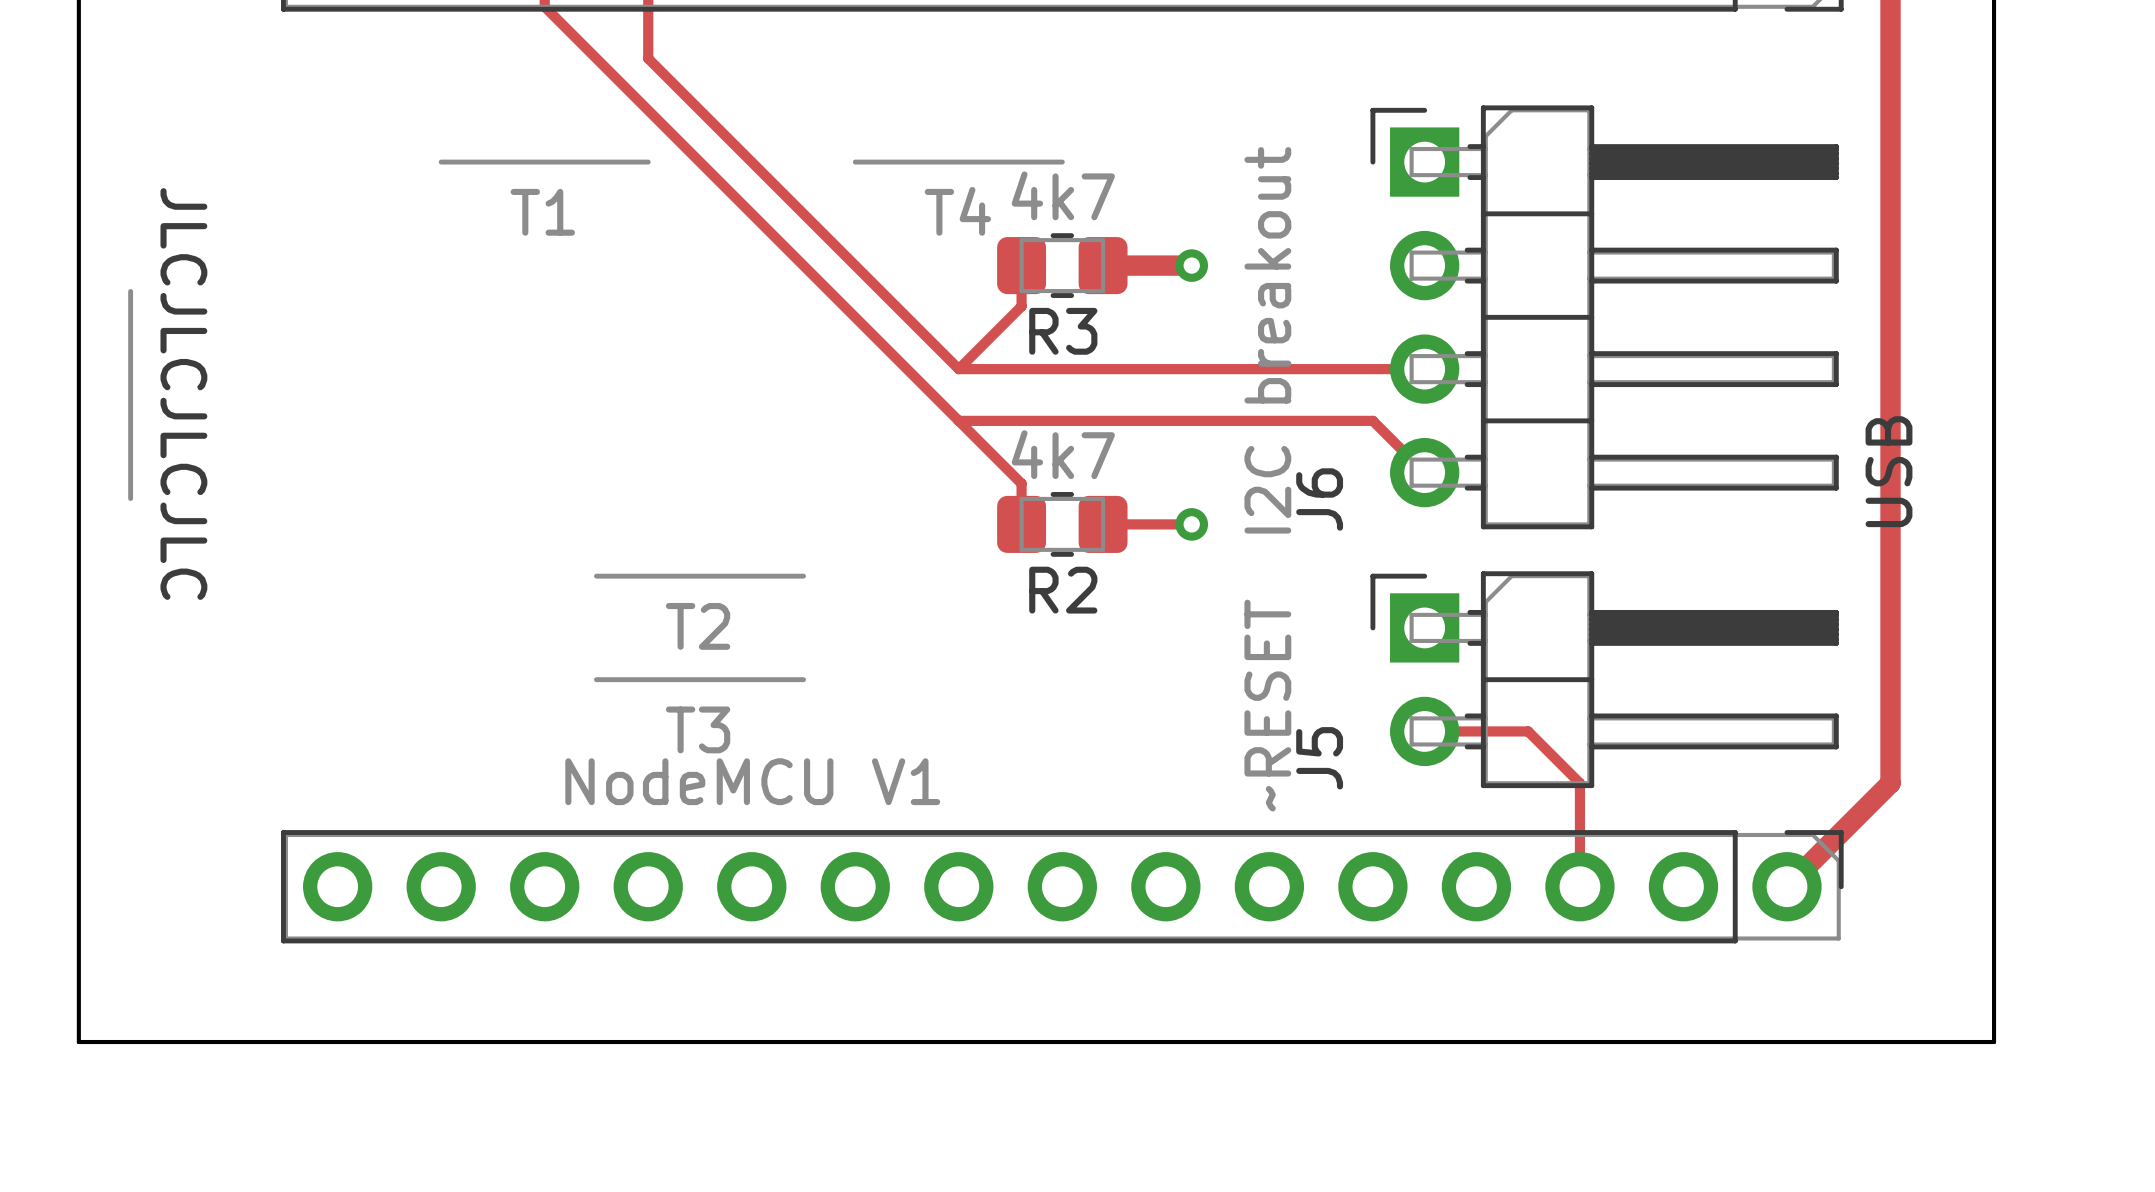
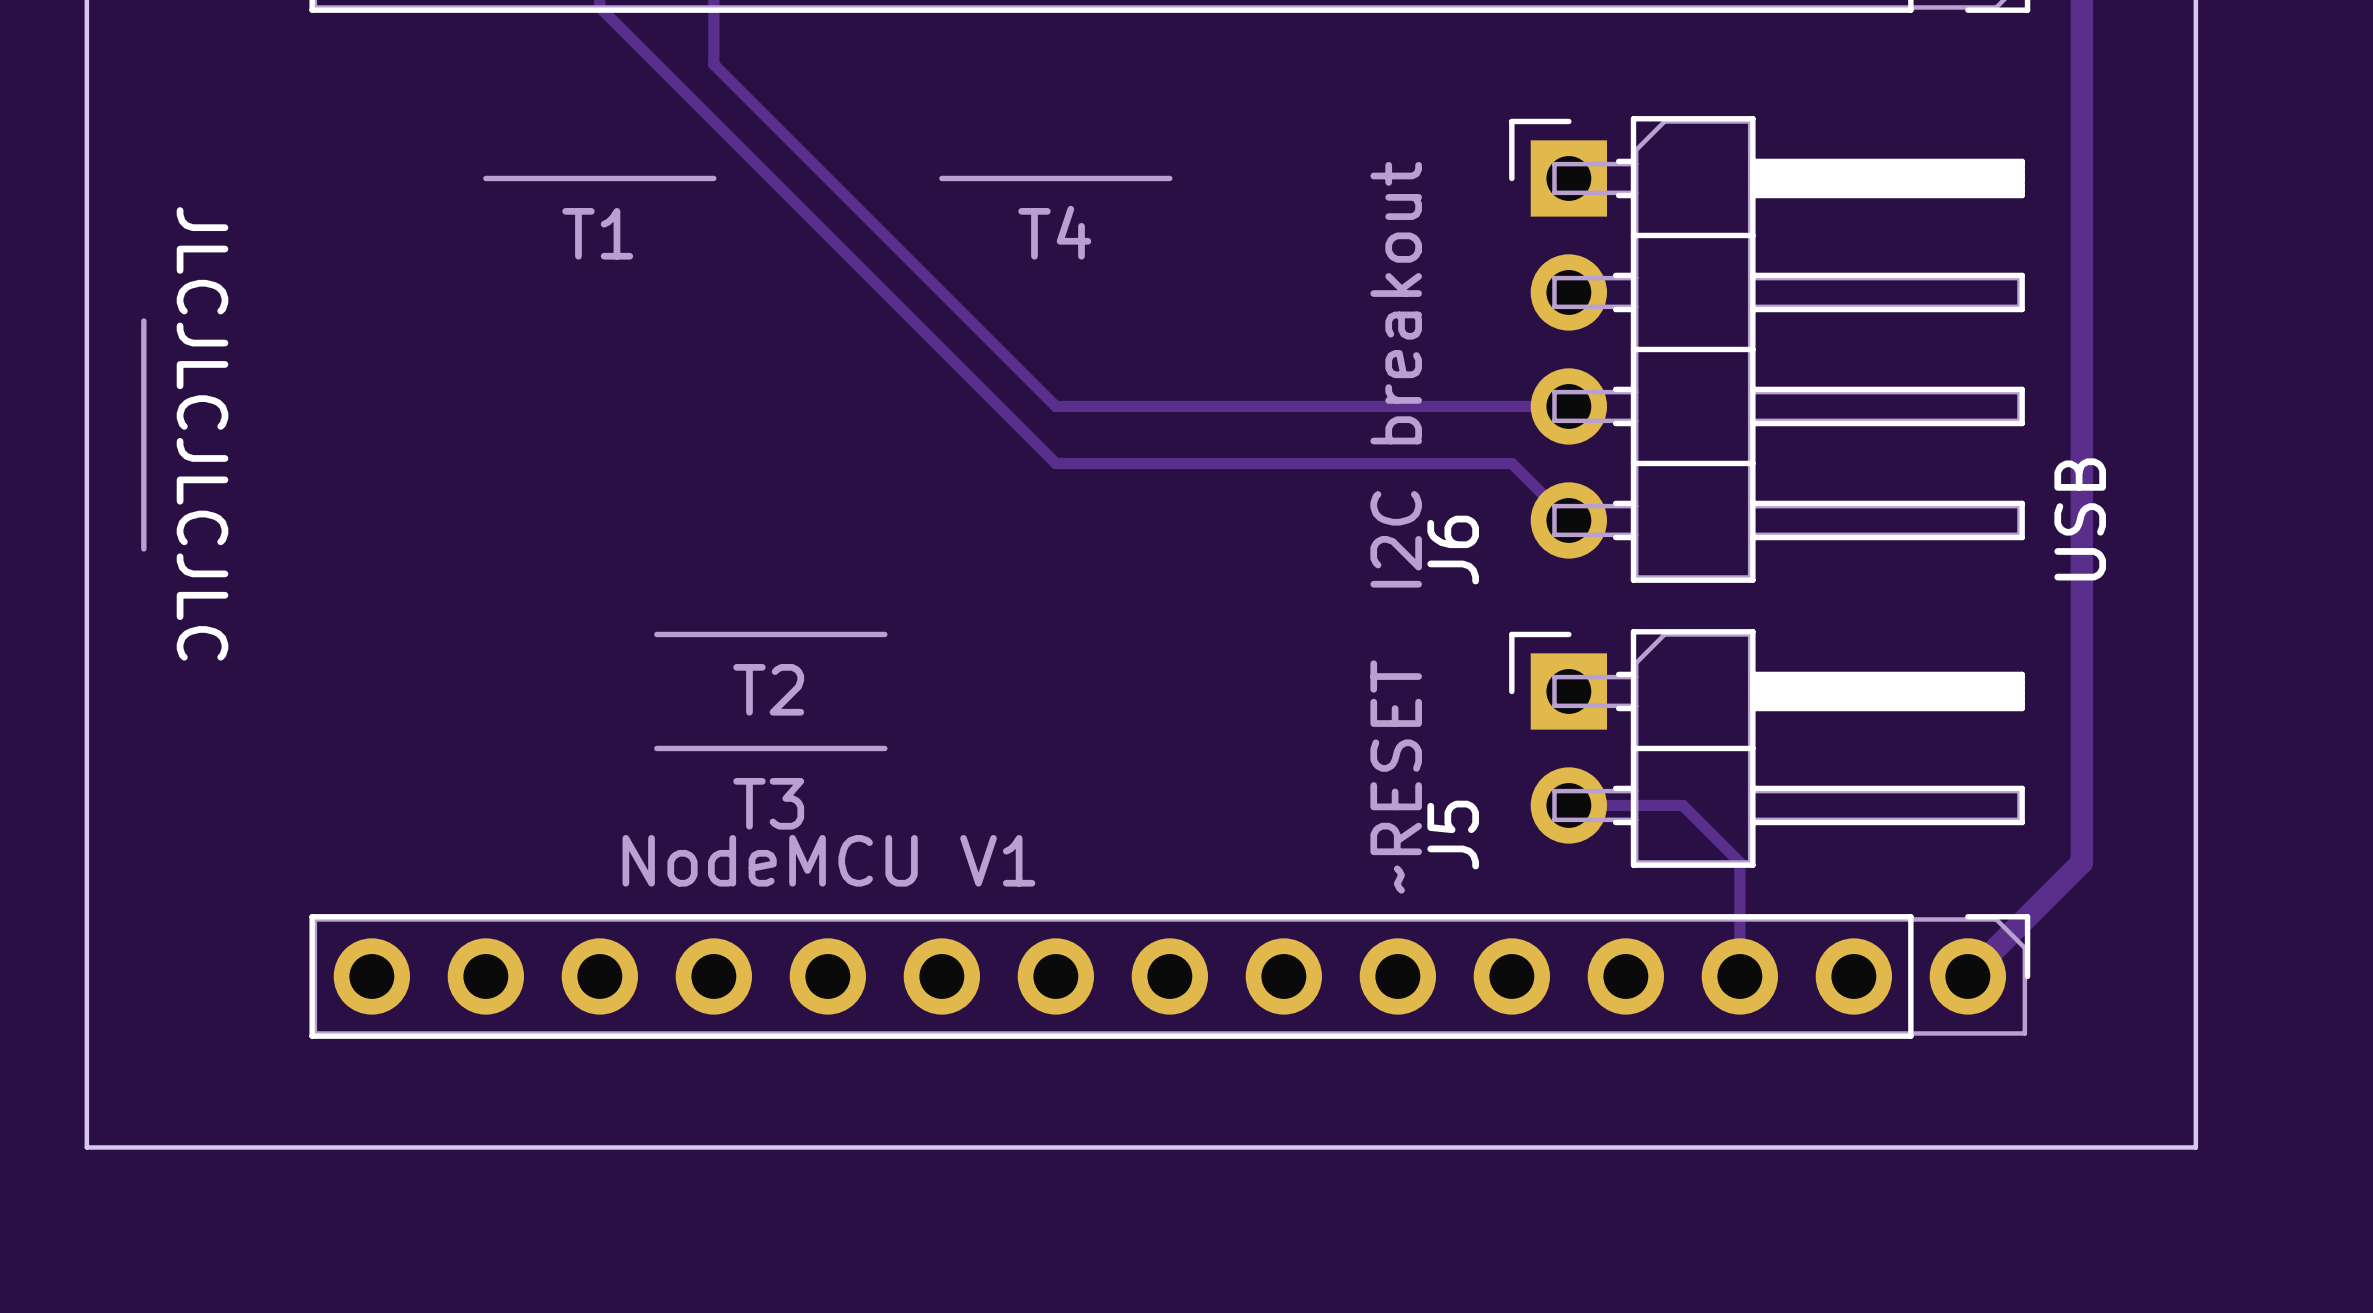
track: (1021, 265) (1021, 306) (958, 369) -> none
R3: 4k7 (1062, 265) -> none
track: (1103, 265) (1191, 265) -> none
via: (1191, 265) -> none
track: (958, 420) (1021, 483) (1021, 524) -> none
R2: 4k7 (1062, 524) -> none
track: (1103, 524) (1191, 524) -> none
via: (1191, 524) -> none

